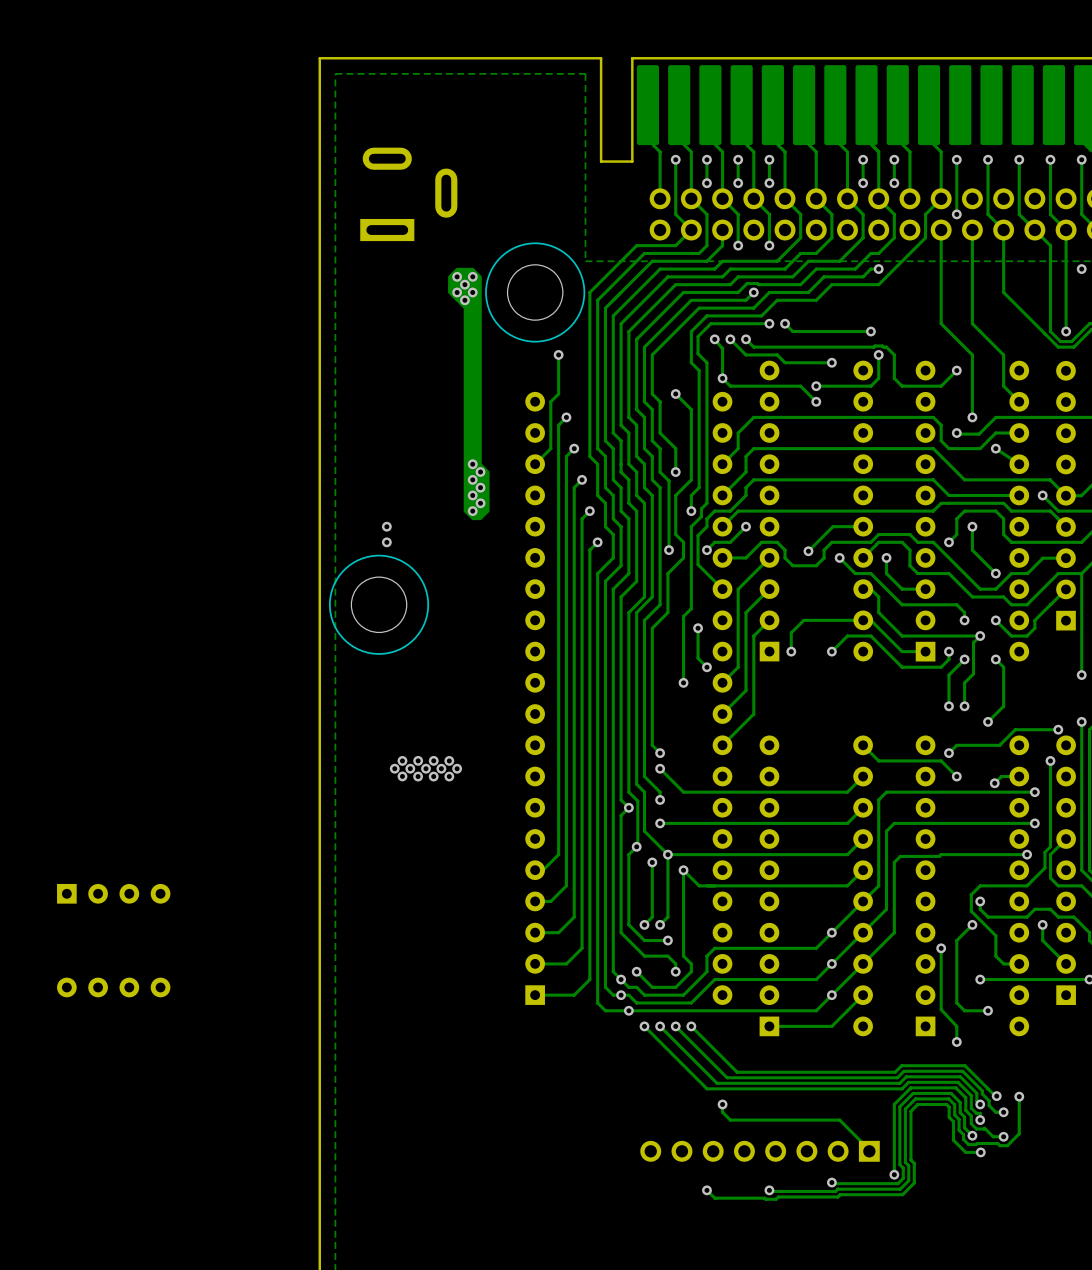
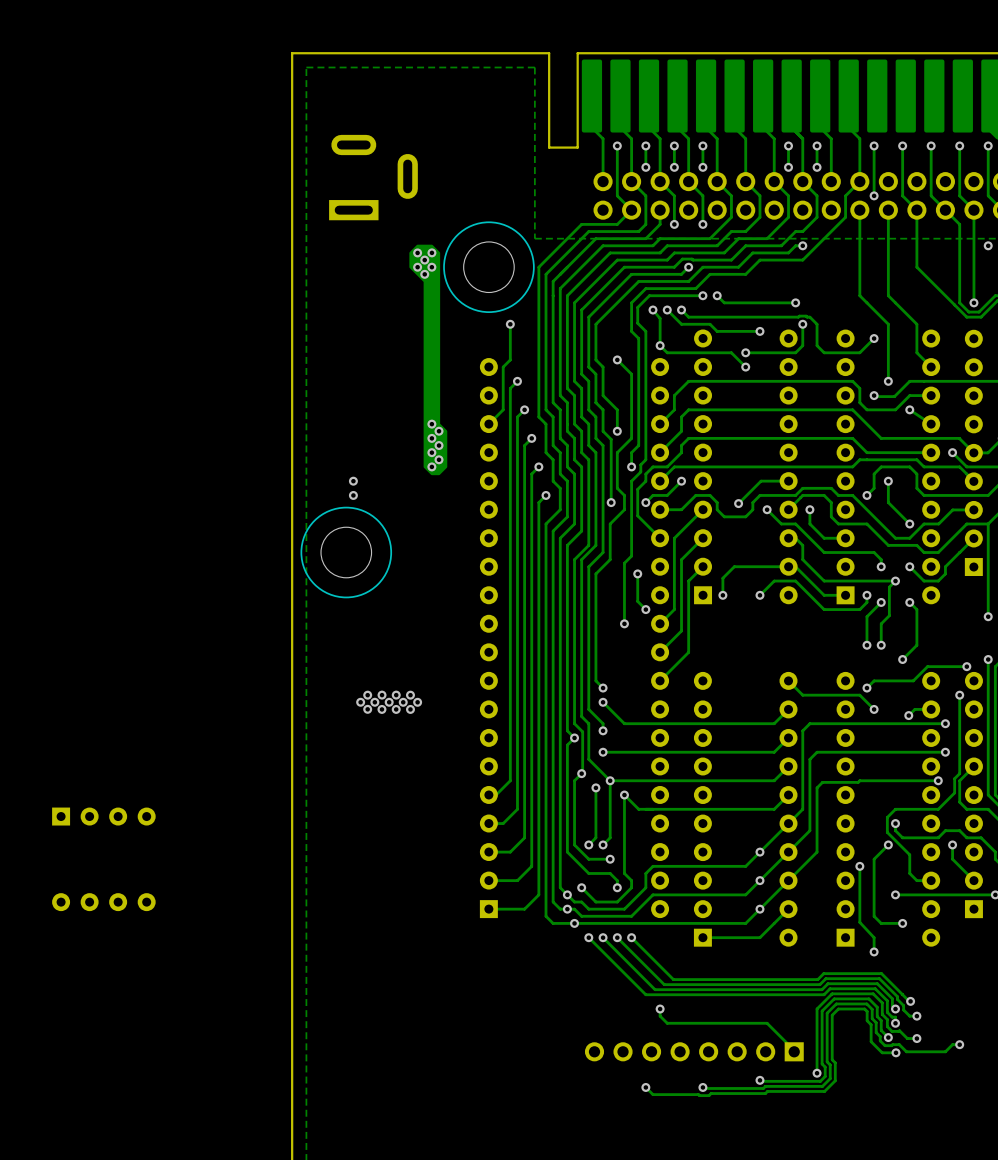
track: (1019, 1096) (1019, 1133) (1007, 1145) (984, 1143) -> (959, 1044) (952, 1044) (945, 1051) (906, 1051) (899, 1044)
via position: (1019, 1096) -> (959, 1044)

